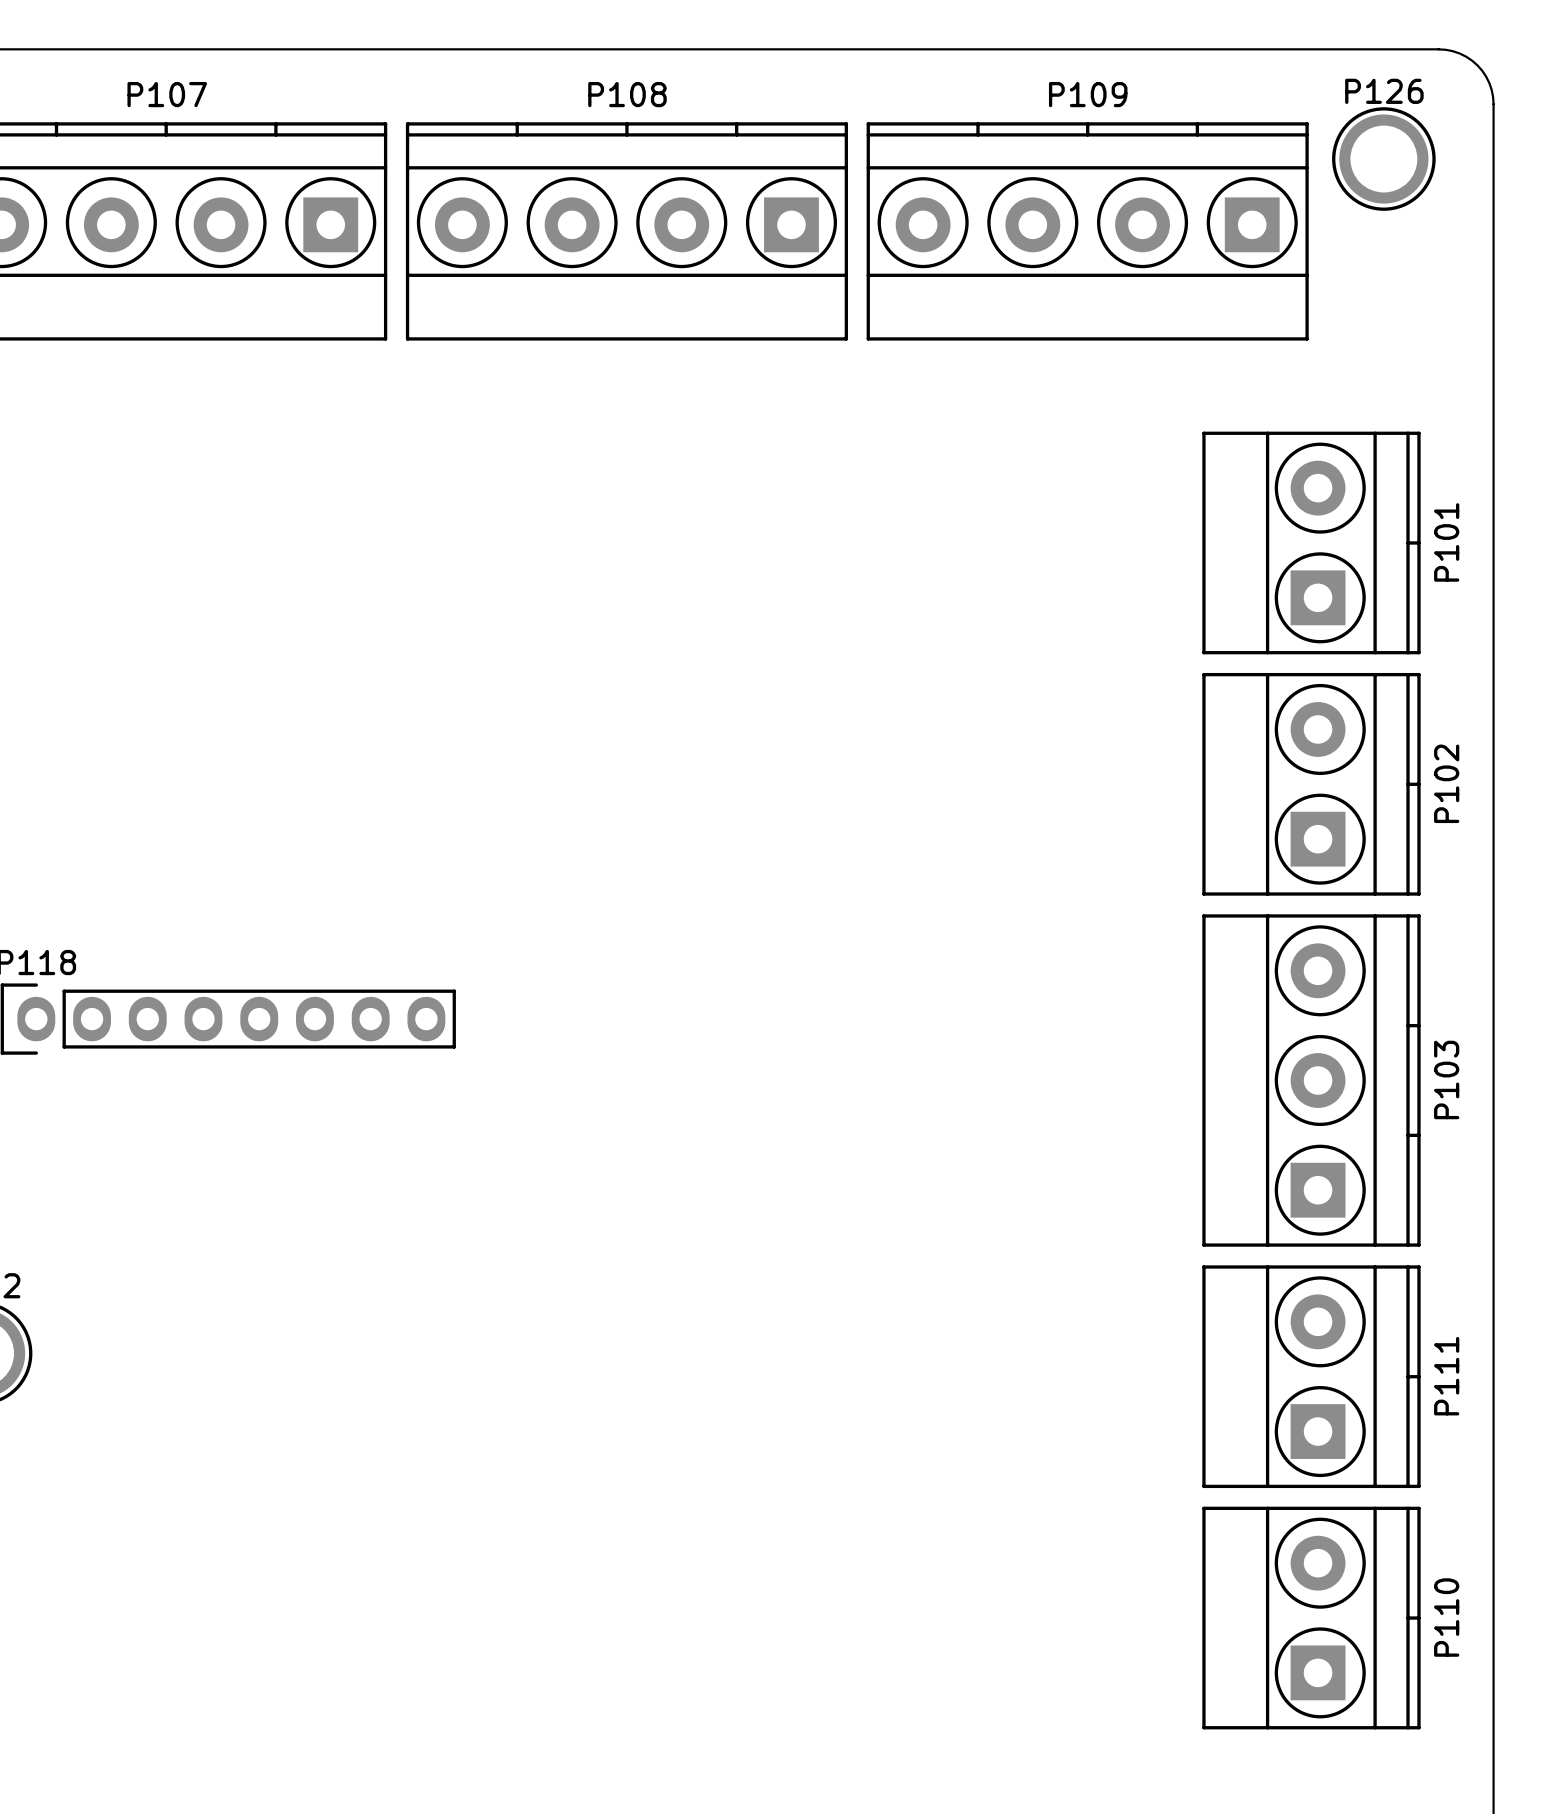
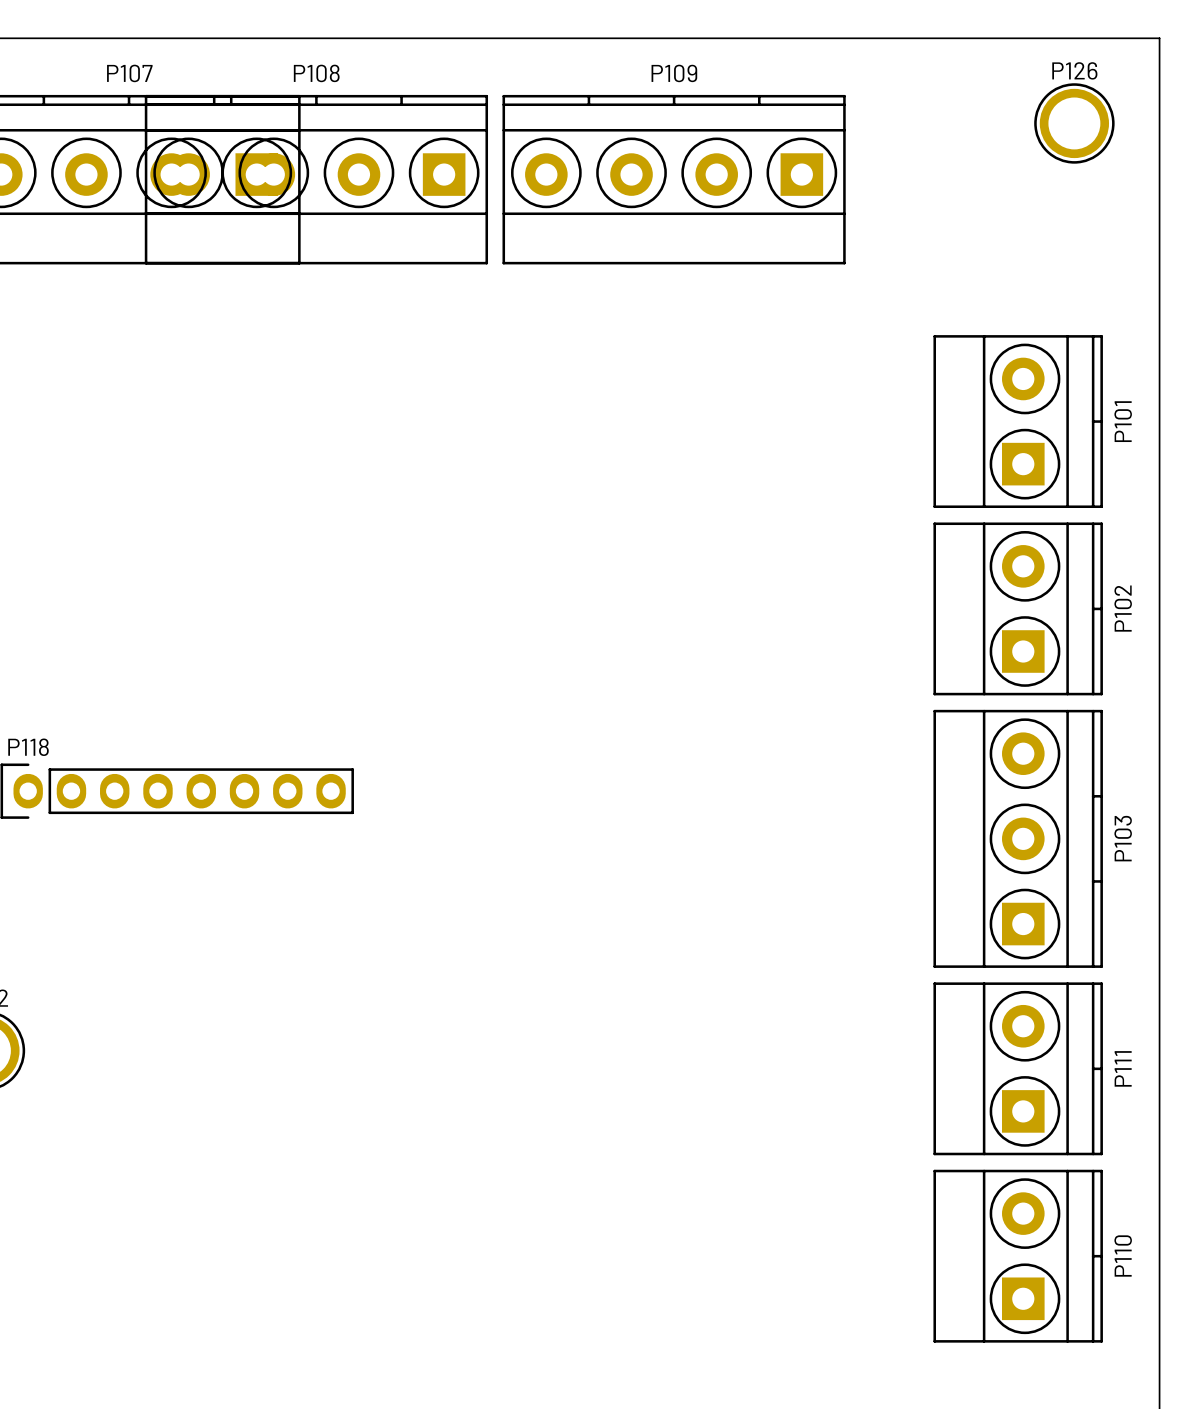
board edge: (1438, 49) (1459, 53) (1477, 65) (1489, 83) (1493, 104) -> (1116, 38) (1159, 38) (1159, 80)
P108 position: (626, 231) -> (316, 179)
P109 position: (1087, 231) -> (674, 179)

